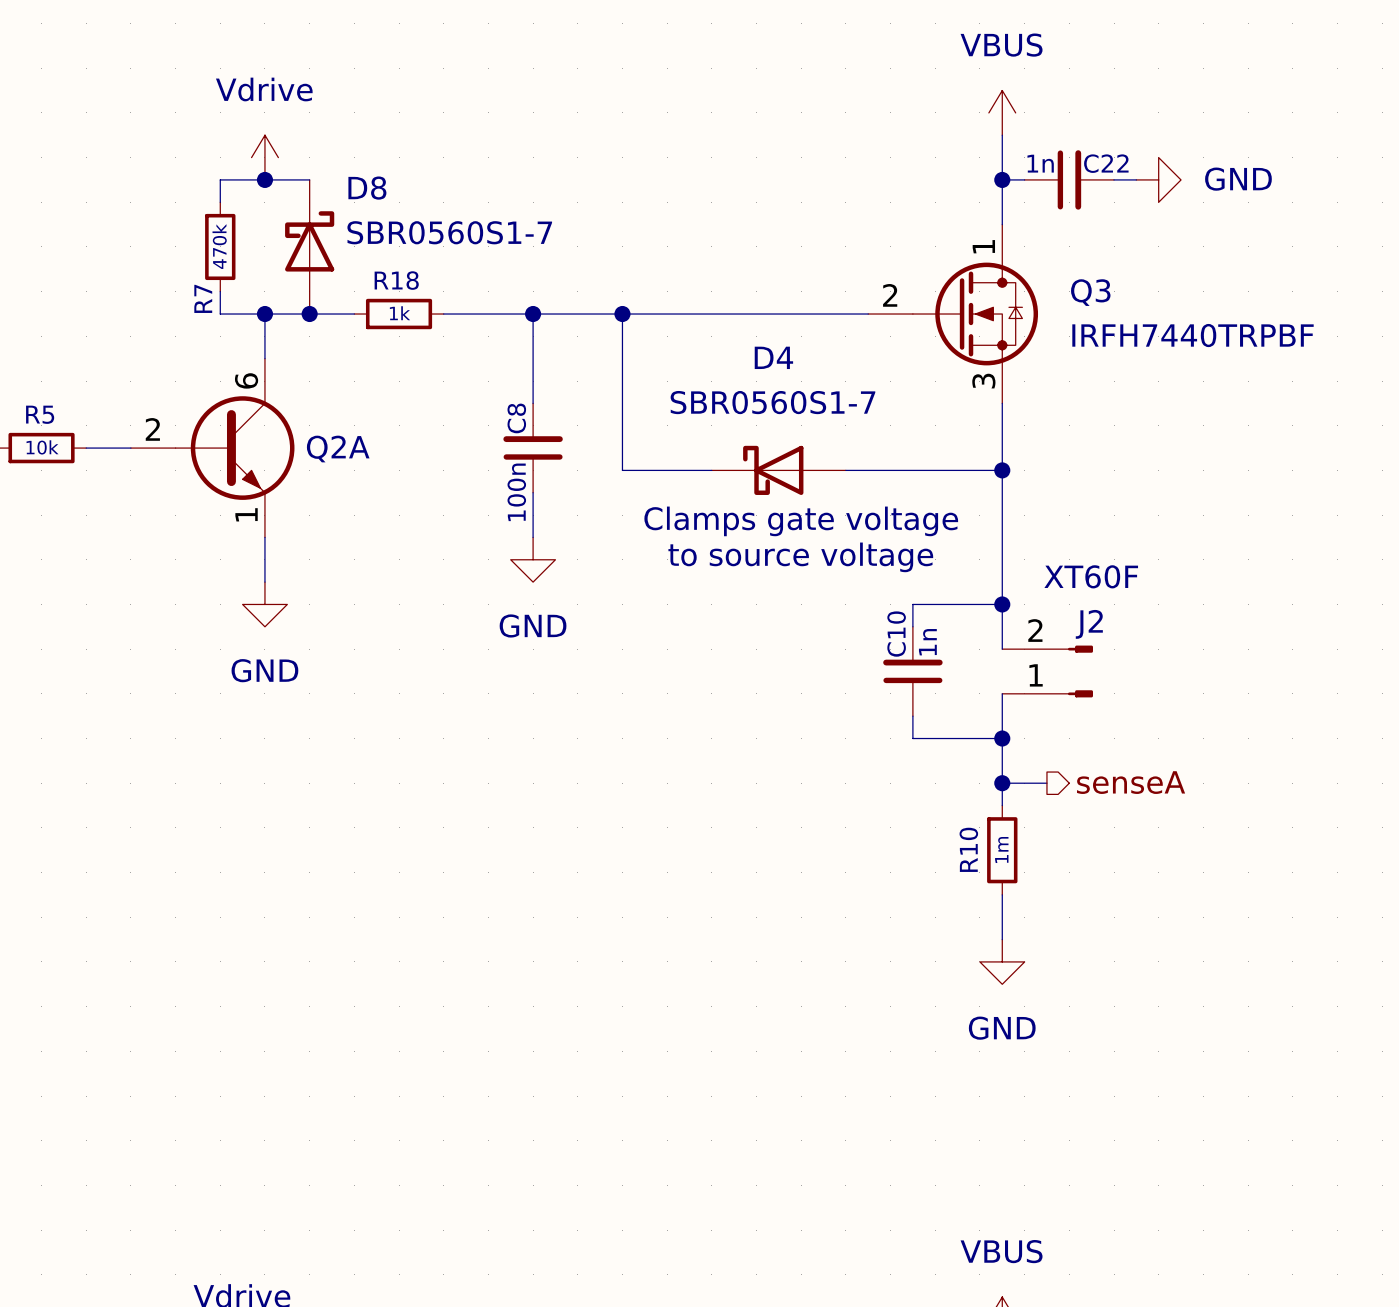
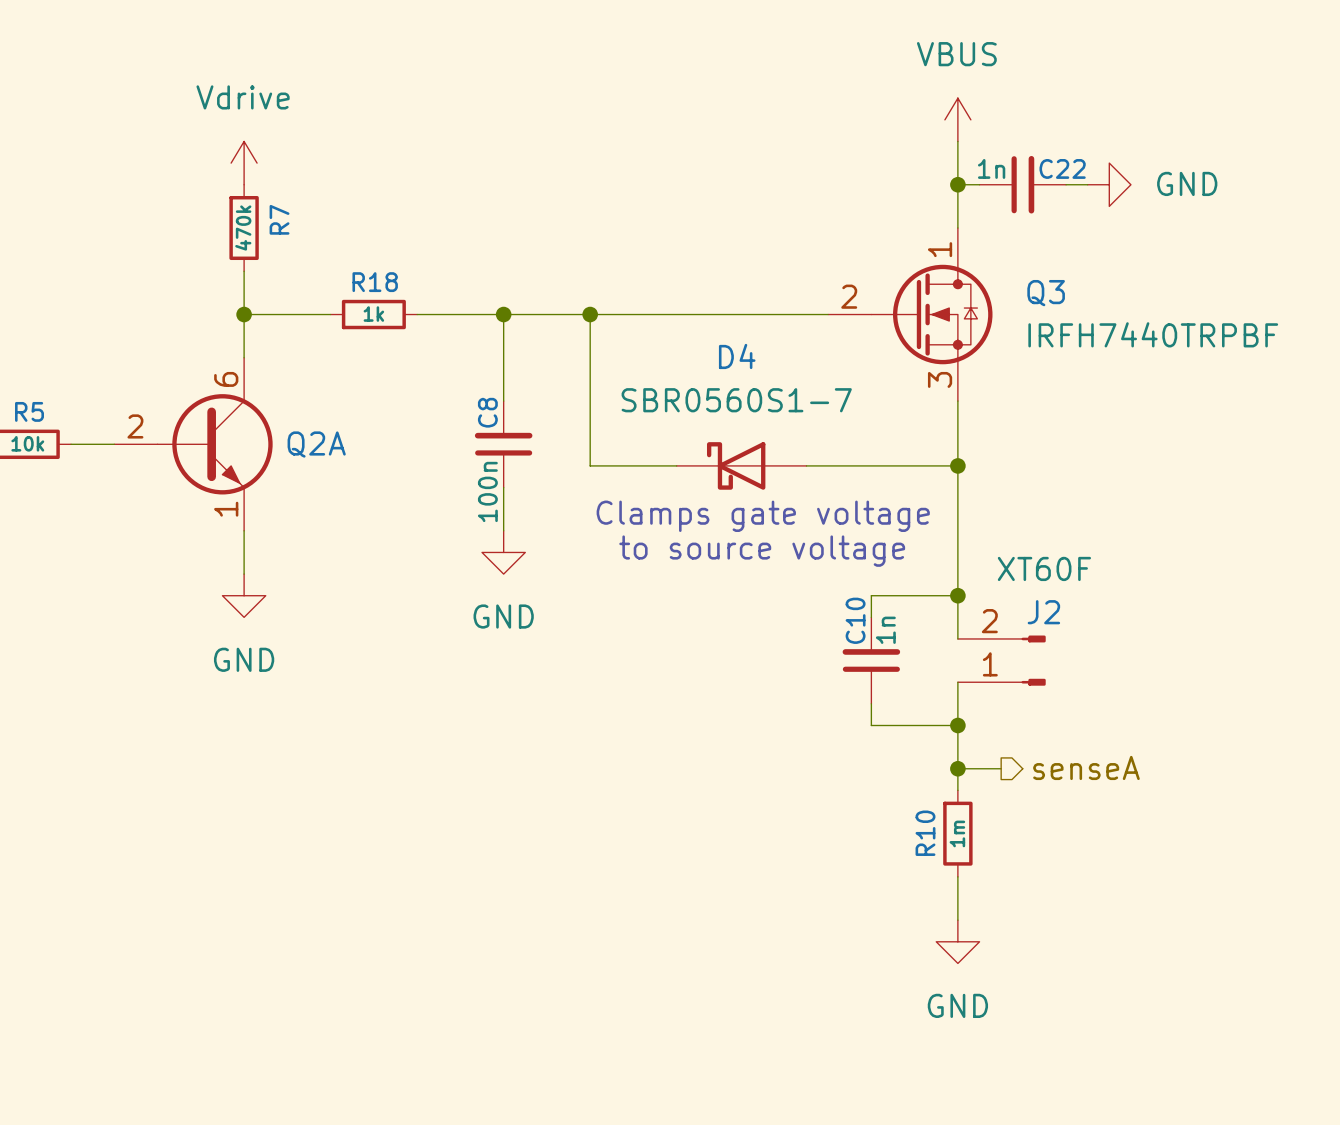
junction: (264, 179) -> none
wire: (309, 179) (220, 179) (220, 202) -> none
R7 position: (220, 246) -> (244, 228)
D8: SBR0560S1-7 (309, 246) -> none
wire: (220, 291) (220, 314) (264, 314) -> (244, 271) (244, 314)
R7 name position: R7 (203, 298) -> R7 (279, 219)
junction: (309, 314) -> none

